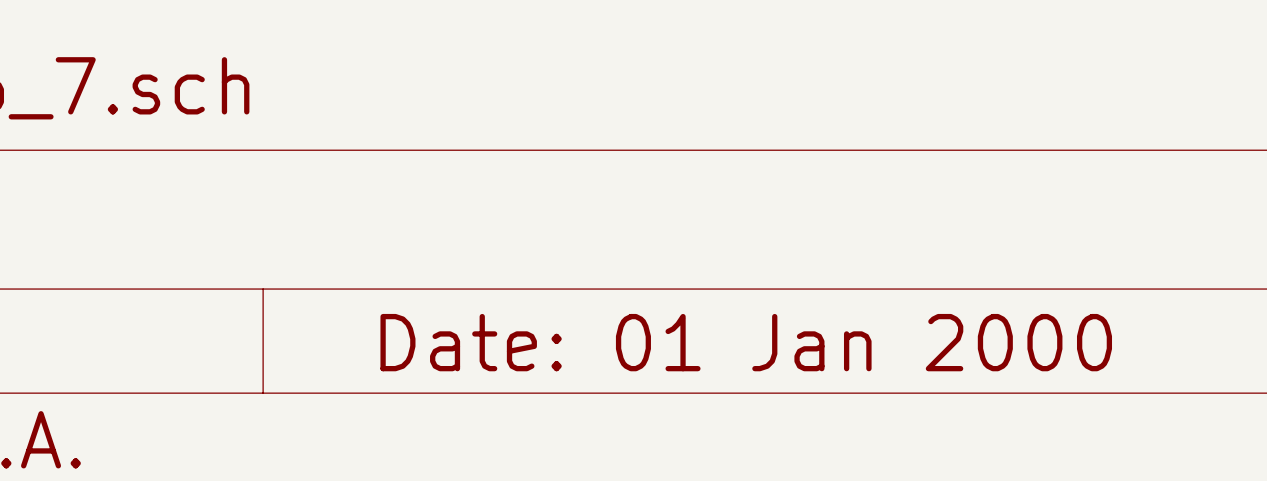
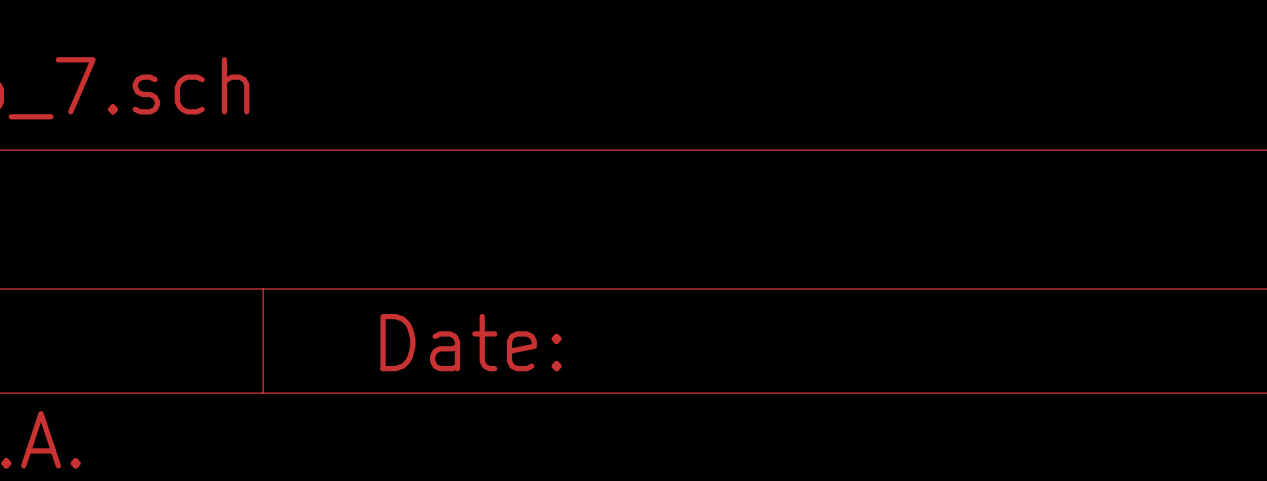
title block: Date: 01 Jan 2000 (746, 342) -> Date: (471, 342)

